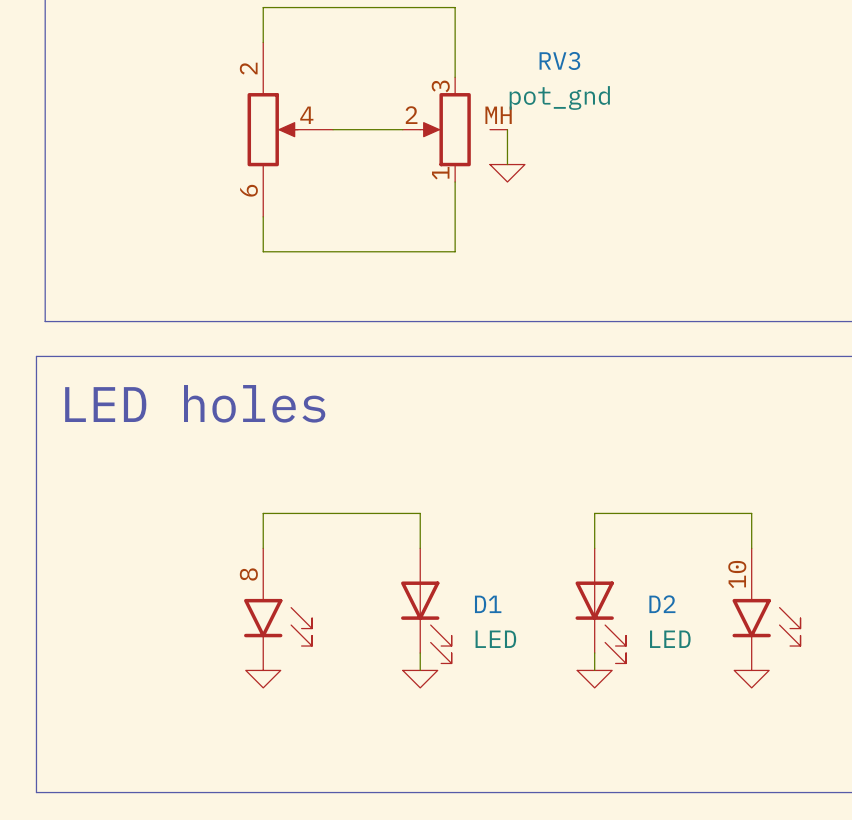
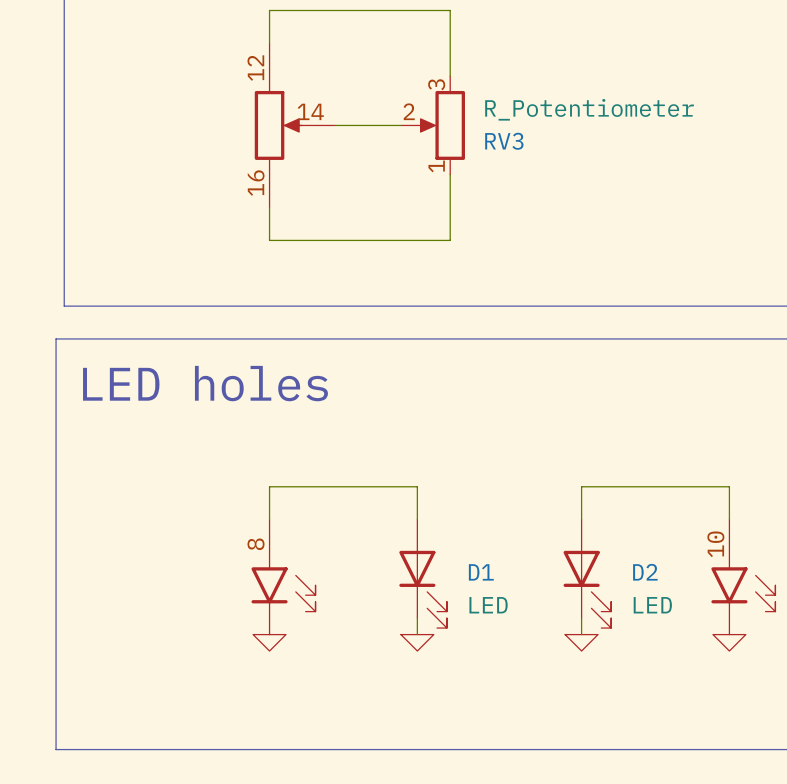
RV3 name position: RV3 (559, 60) -> RV3 (504, 141)
part pin number: 2 (248, 68) -> 12 (255, 68)
RV3 symbol: [402, 77, 508, 183] -> [400, 76, 465, 175]
RV3 value: pot_gnd (559, 97) -> R_Potentiometer (589, 109)
part pin number: 4 (306, 115) -> 14 (310, 111)
wire: (507, 129) (507, 164) -> none
power symbol: (507, 173) -> none
part pin number: 6 (249, 190) -> 16 (256, 183)

